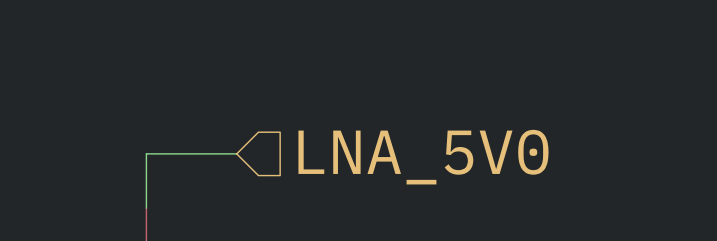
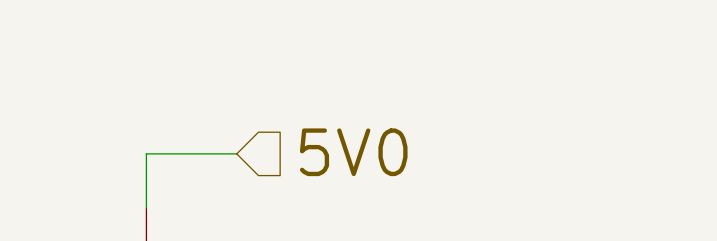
hierarchical label: LNA_5V0 (423, 157) -> 5V0 (353, 152)

